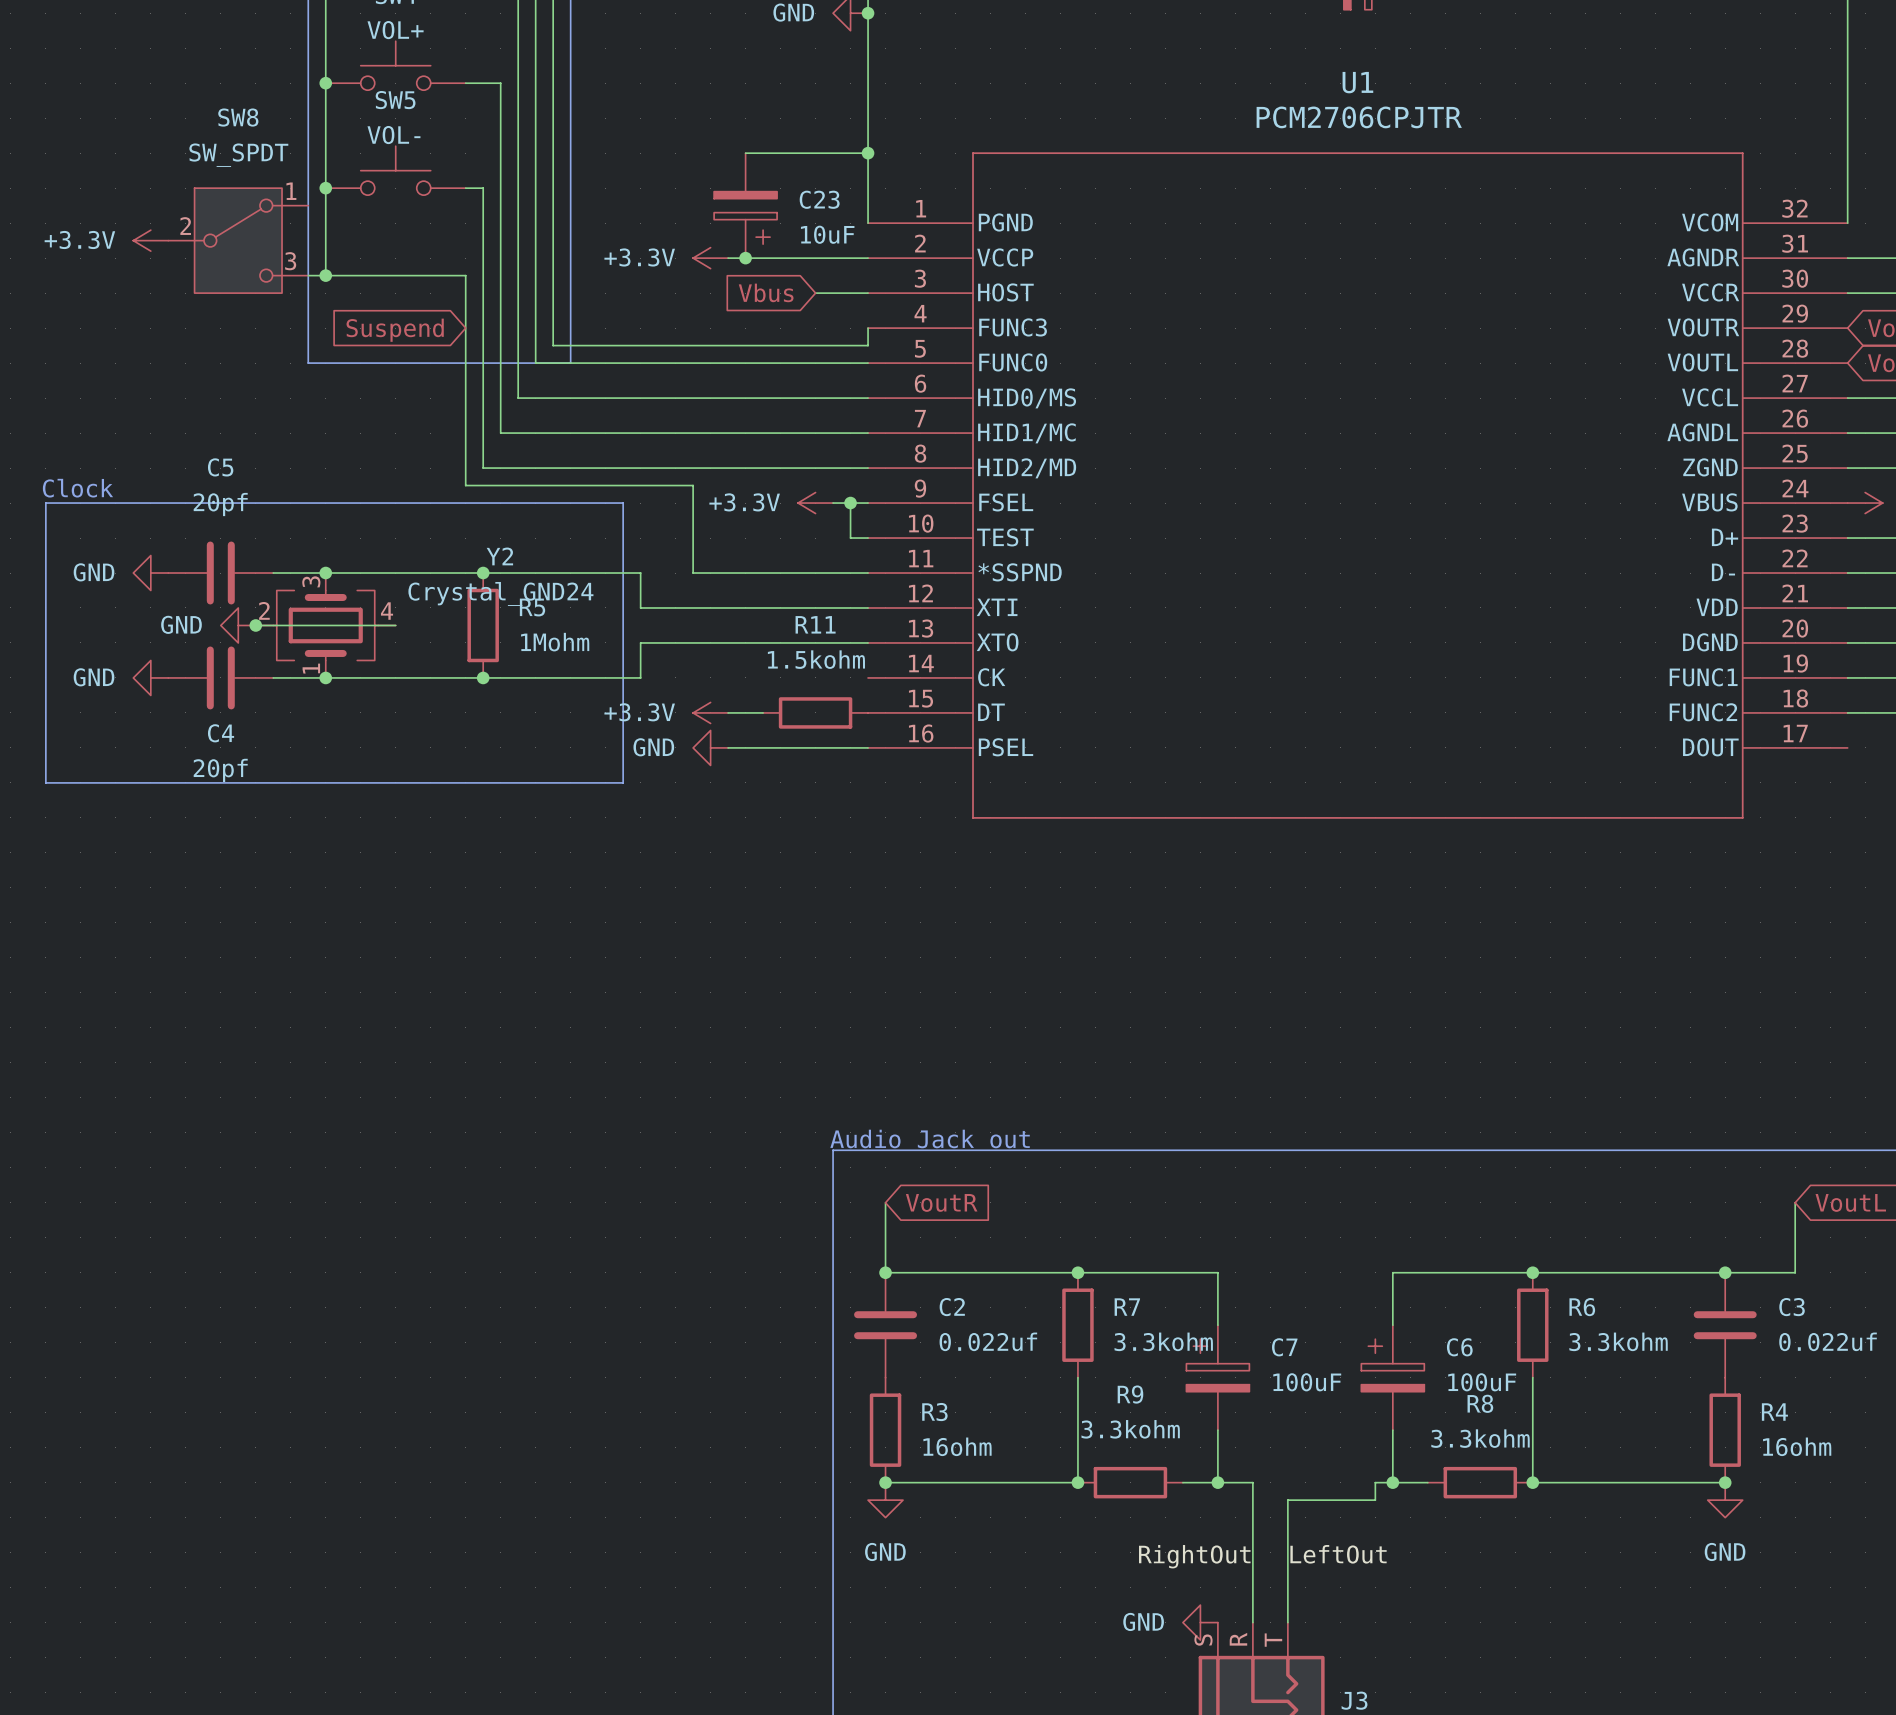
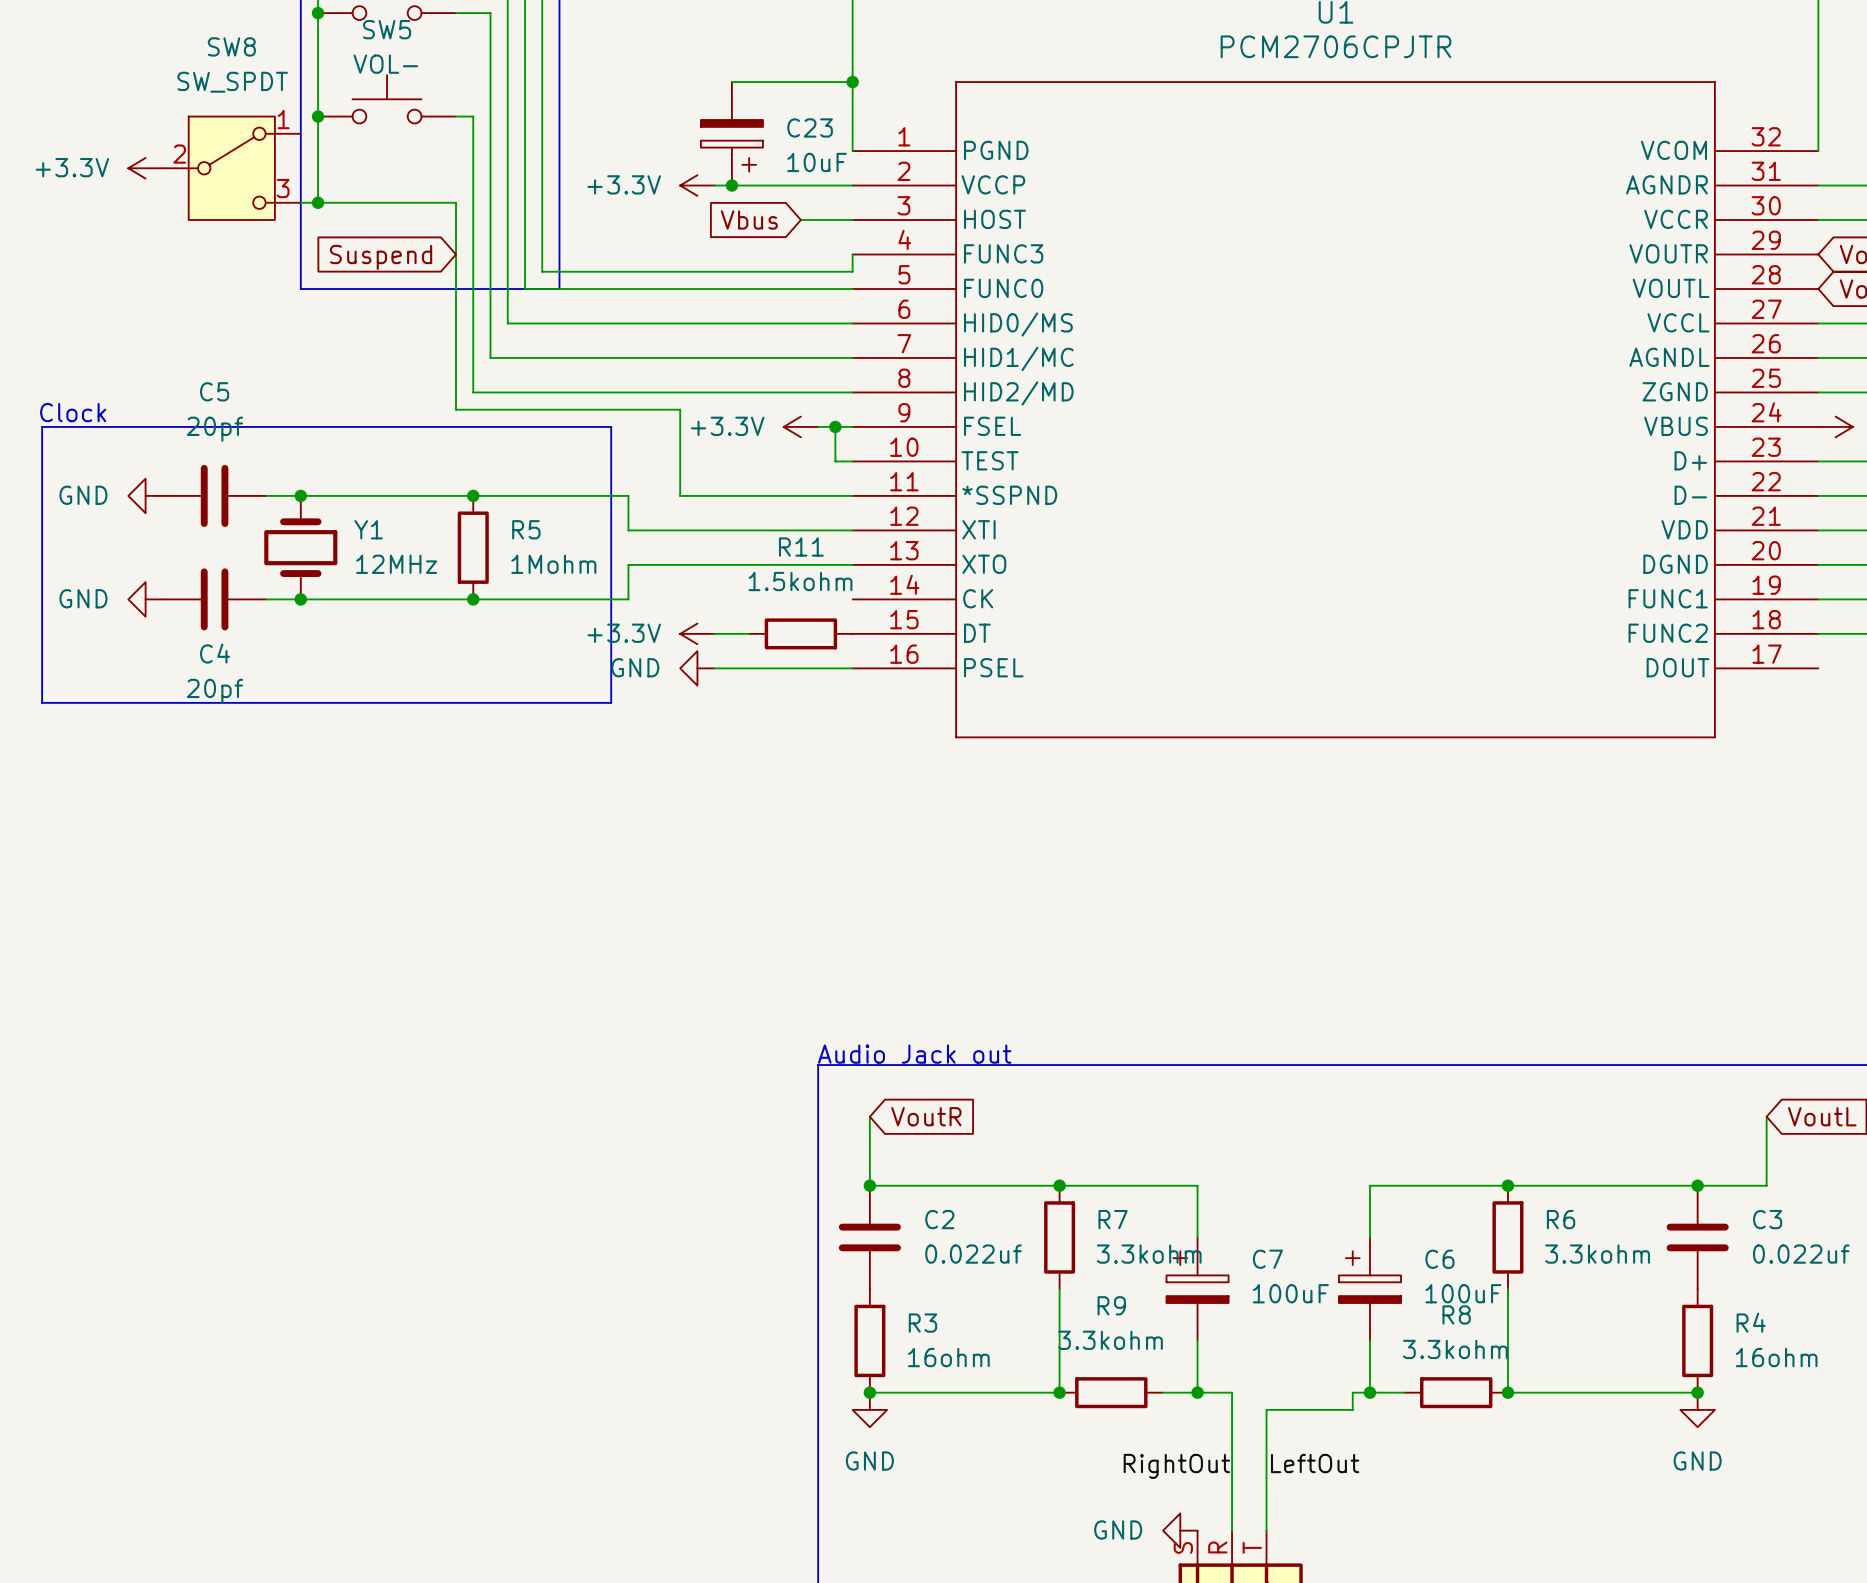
junction position: (325, 573) -> (300, 495)
power symbol: GND (238, 625) -> none
wire: (255, 625) (395, 625) -> none
junction: (255, 625) -> none
Y1: none -> 12MHz (300, 547)
Y2: Crystal_GND24 (325, 625) -> none
junction position: (325, 677) -> (300, 599)

